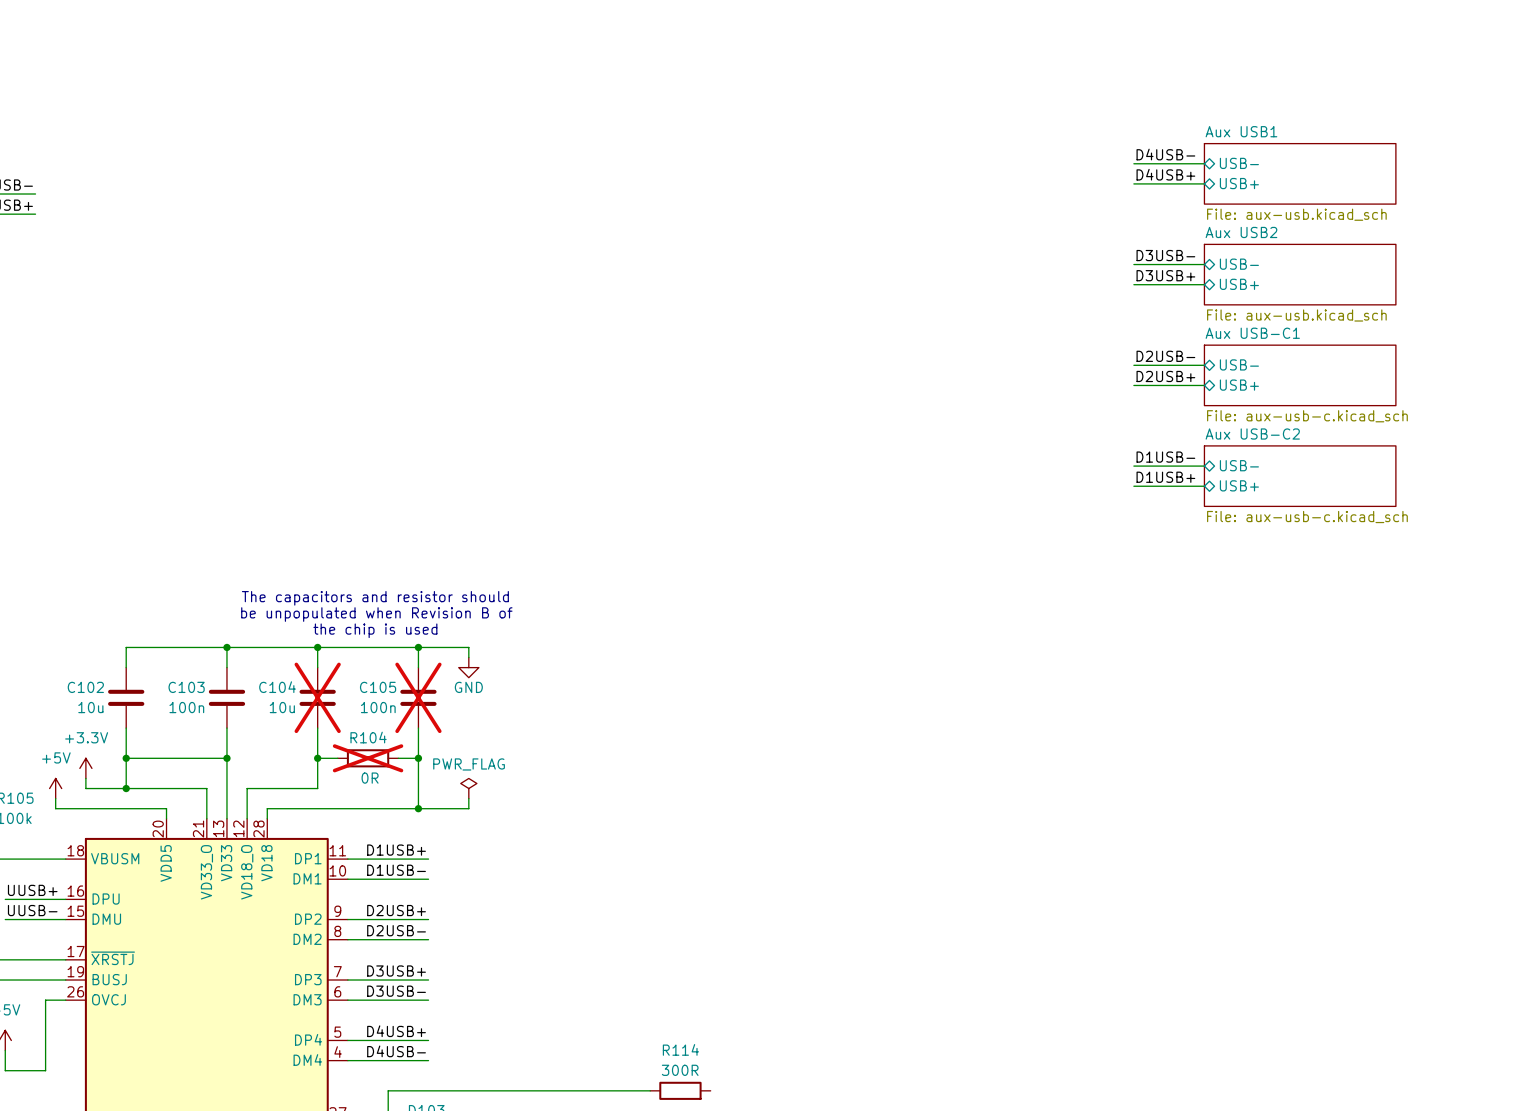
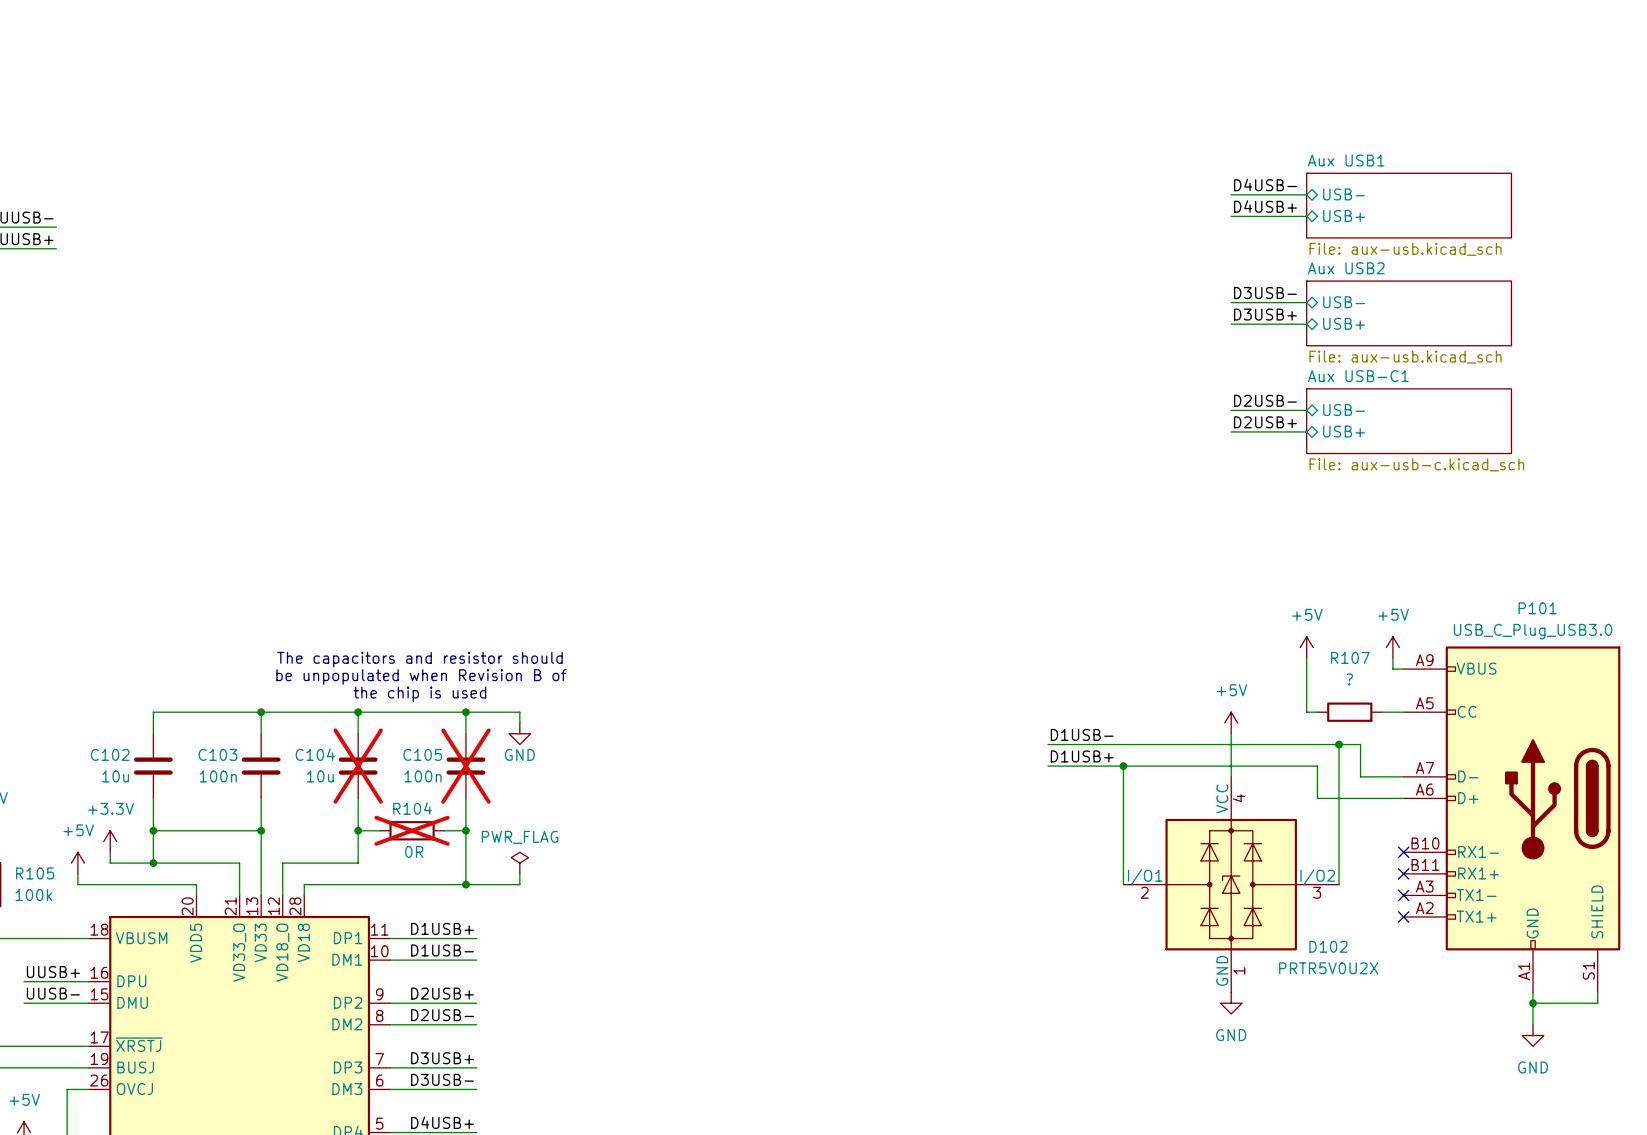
label: D1USB- (1165, 457) -> none
sheet pin: USB- (1239, 465) -> none
wire: (1133, 466) (1204, 466) -> none
sheet Aux USB-C2: File: aux-usb-c.kicad_sch (1300, 476) -> none
label: D1USB+ (1165, 477) -> none
sheet pin: USB+ (1239, 485) -> none
wire: (1133, 486) (1204, 486) -> none
power symbol: none -> +5V (1306, 647)
power symbol: none -> +5V (1392, 647)
wire: none -> (1306, 658) (1306, 712) (1317, 712)
wire: none -> (1392, 658) (1392, 669) (1403, 669)
R107: none -> ? (1349, 712)
wire: none -> (1382, 712) (1403, 712)
power symbol: none -> +5V (1231, 722)
wire: none -> (1231, 733) (1231, 776)
label: none -> D1USB- (1082, 734)
wire: none -> (1047, 744) (1360, 744) (1360, 776) (1403, 776)
wire: none -> (1339, 744) (1339, 884)
junction: none -> (1339, 744)
label: none -> D1USB+ (1082, 756)
wire: none -> (1047, 766) (1317, 766) (1317, 798) (1403, 798)
wire: none -> (1123, 766) (1123, 884)
junction: none -> (1123, 766)
P101: none -> USB_C_Plug_USB3.0 (1512, 819)
no-connect mark: none -> (1403, 852)
no-connect mark: none -> (1403, 873)
D102: none -> PRTR5V0U2X (1231, 884)
no-connect mark: none -> (1403, 895)
no-connect mark: none -> (1403, 916)
wire: none -> (1533, 992) (1533, 1024)
wire: none -> (1597, 992) (1597, 1003) (1533, 1003)
power symbol: none -> GND (1231, 1003)
junction: none -> (1533, 1003)
power symbol: none -> GND (1533, 1035)

